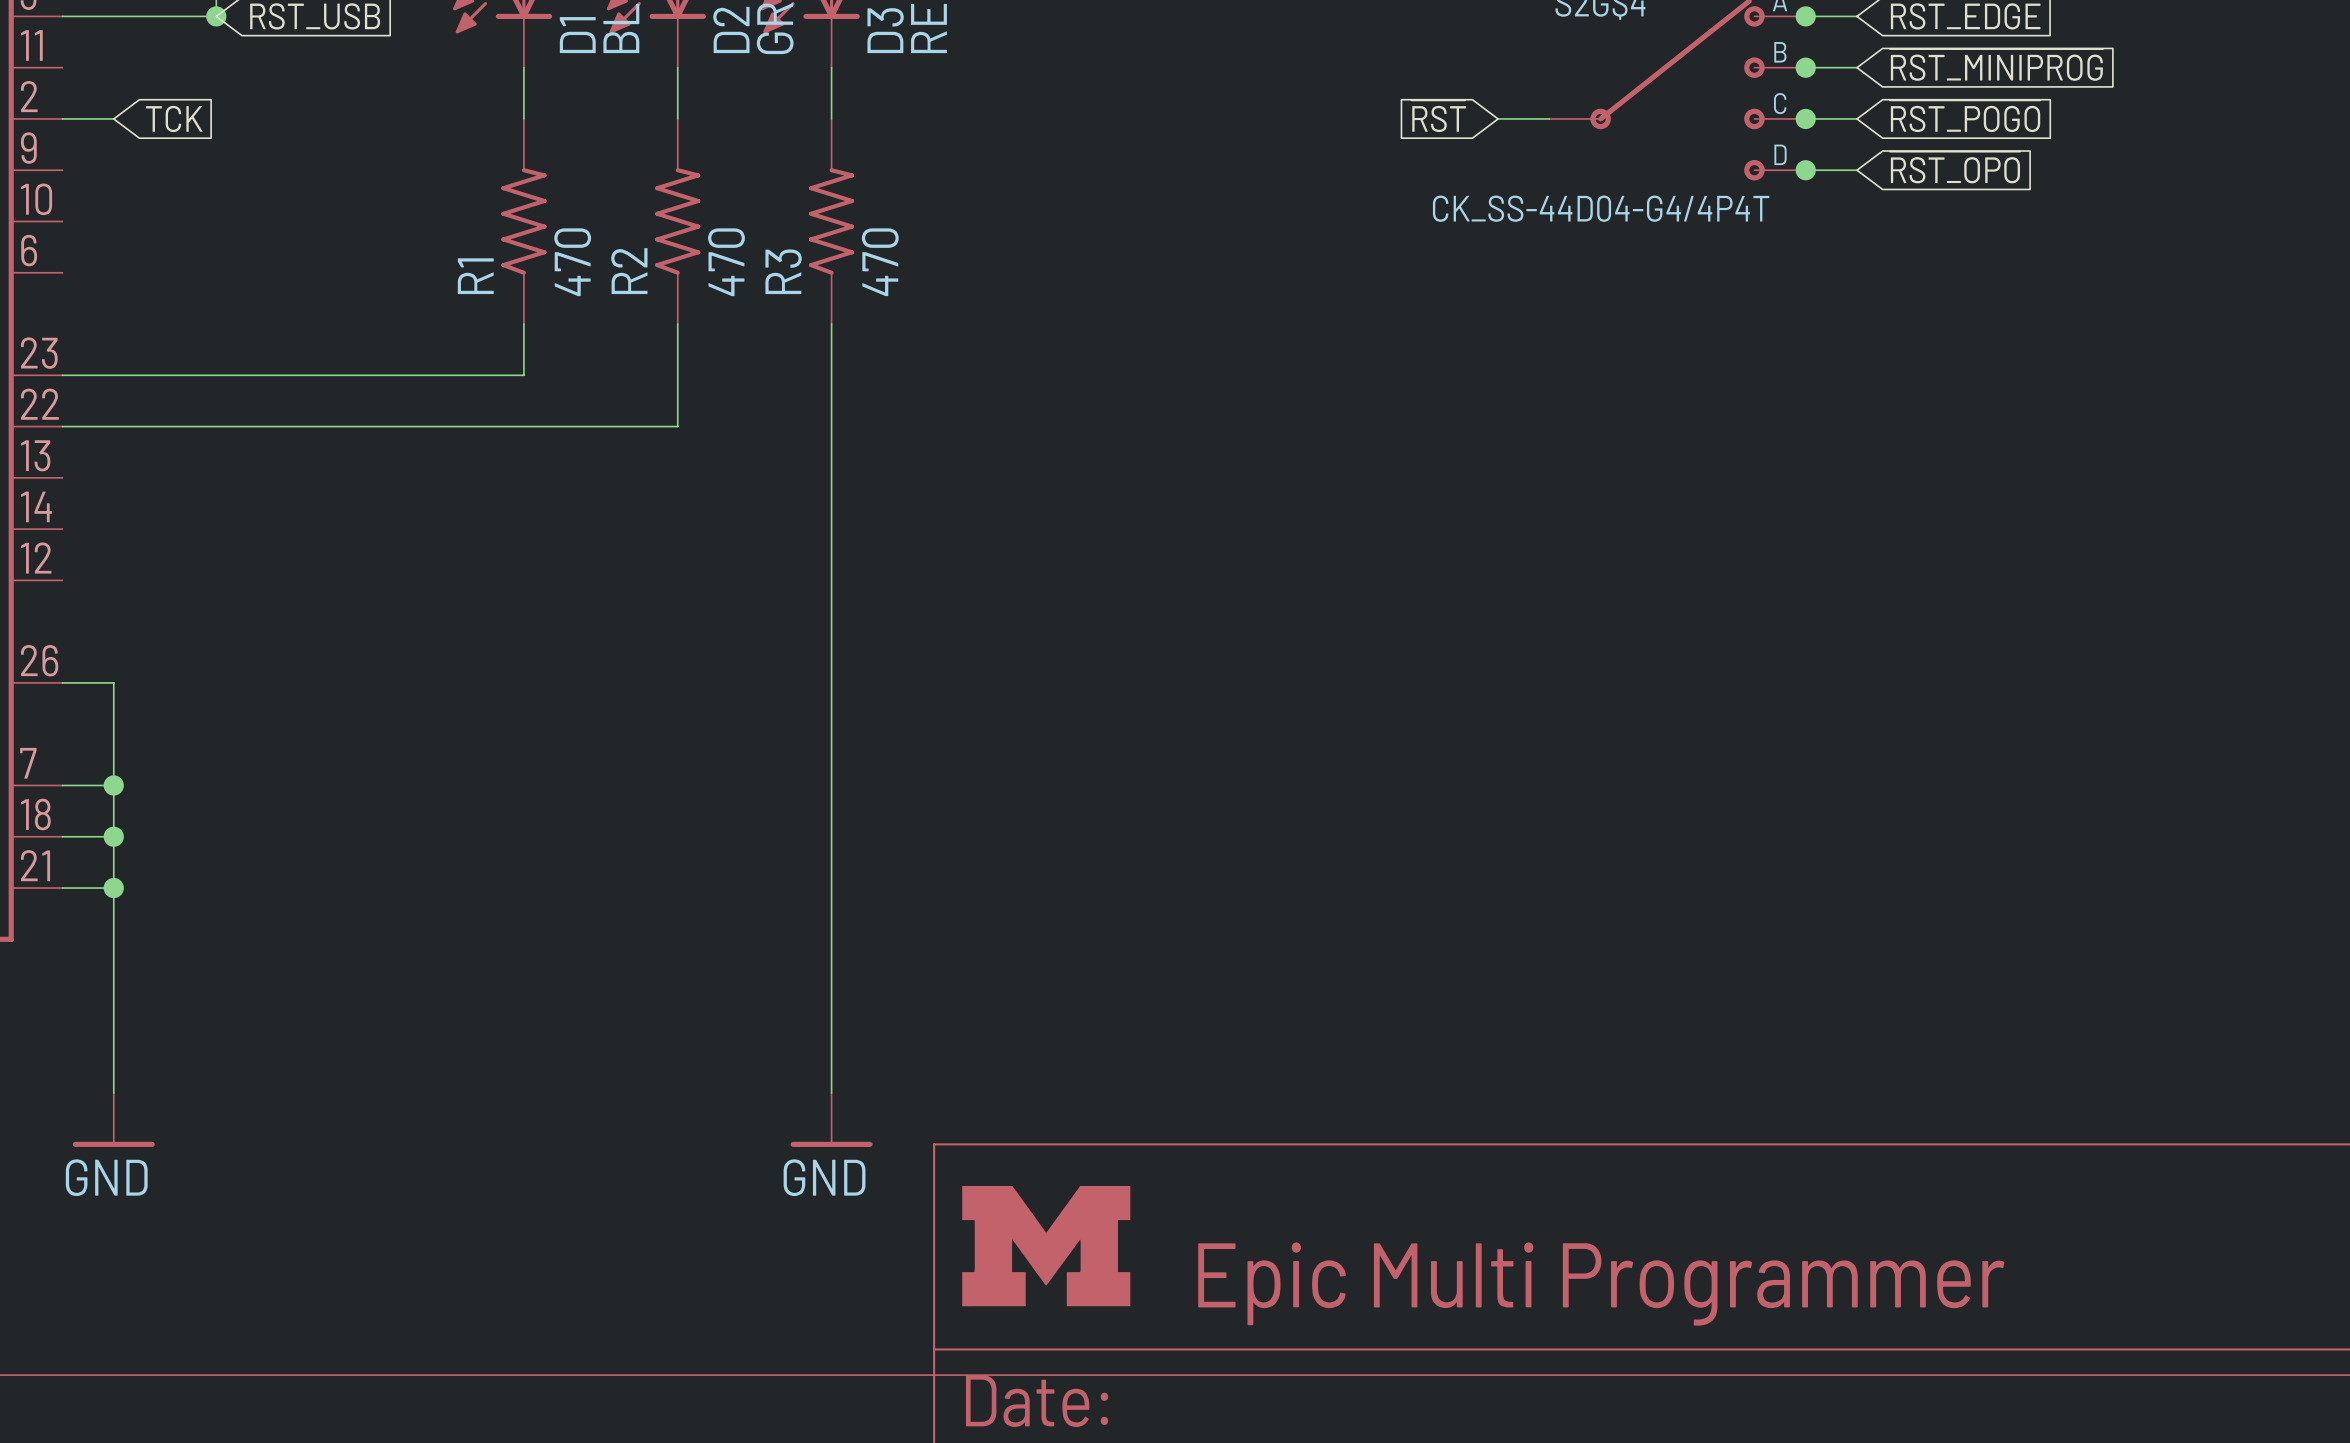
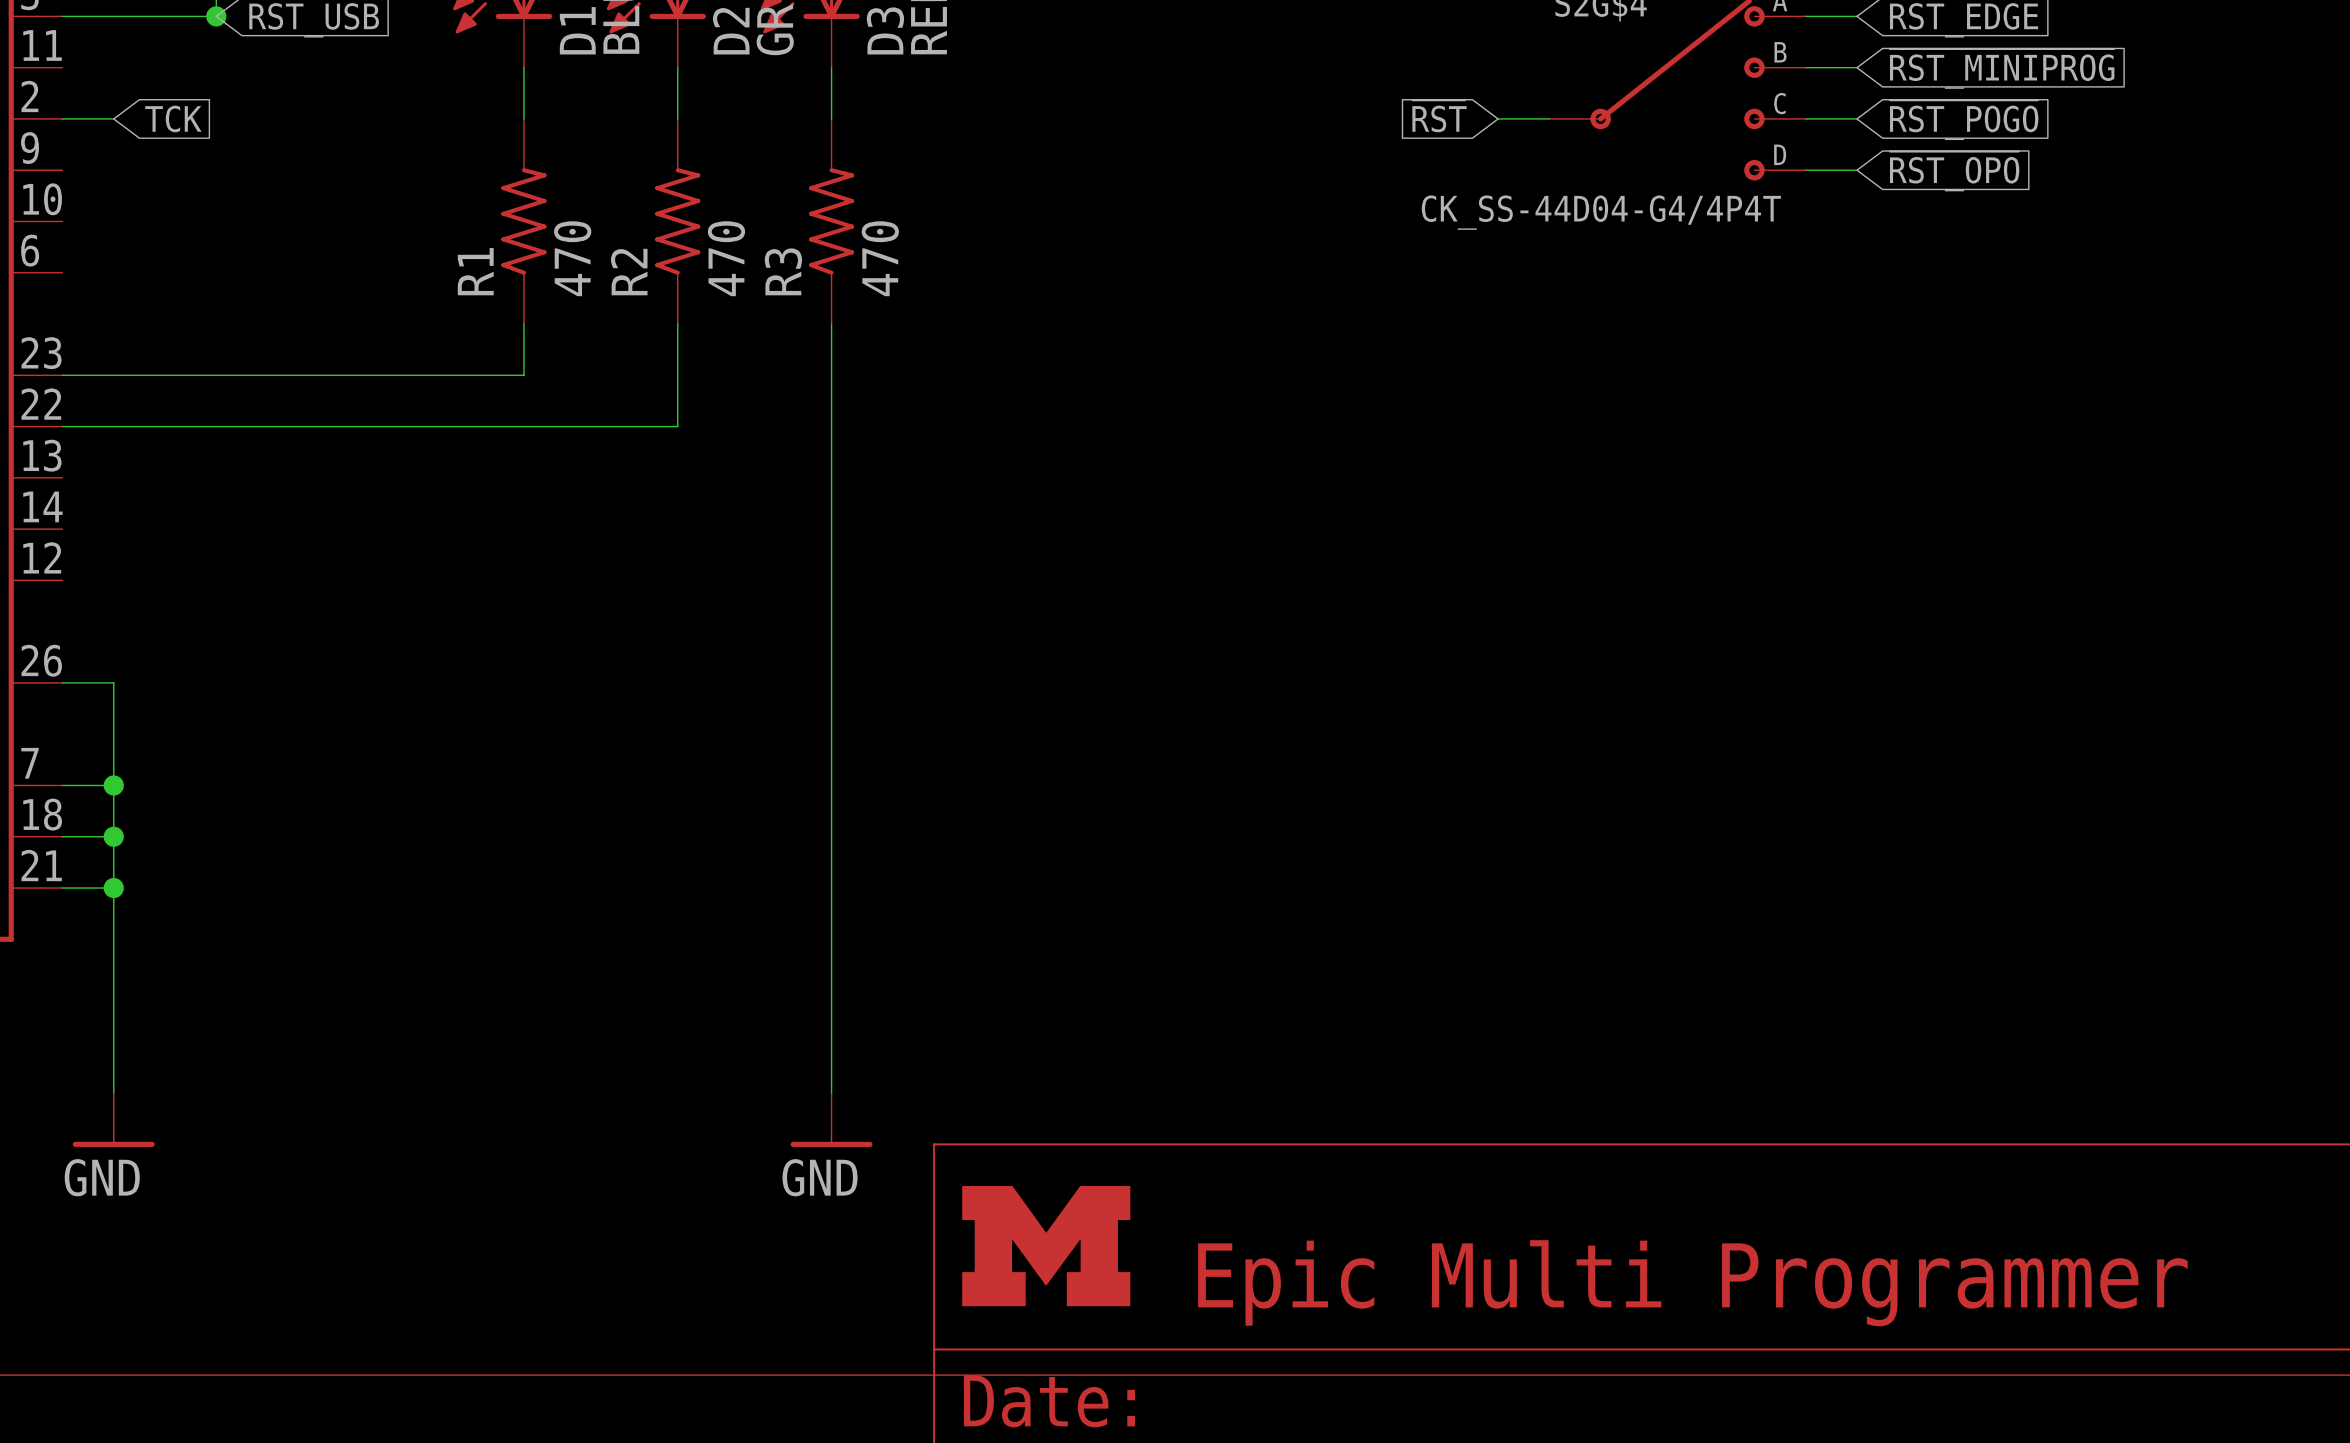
junction: (1805, 16) -> none
junction: (1805, 67) -> none
junction: (1805, 118) -> none
junction: (1805, 170) -> none

